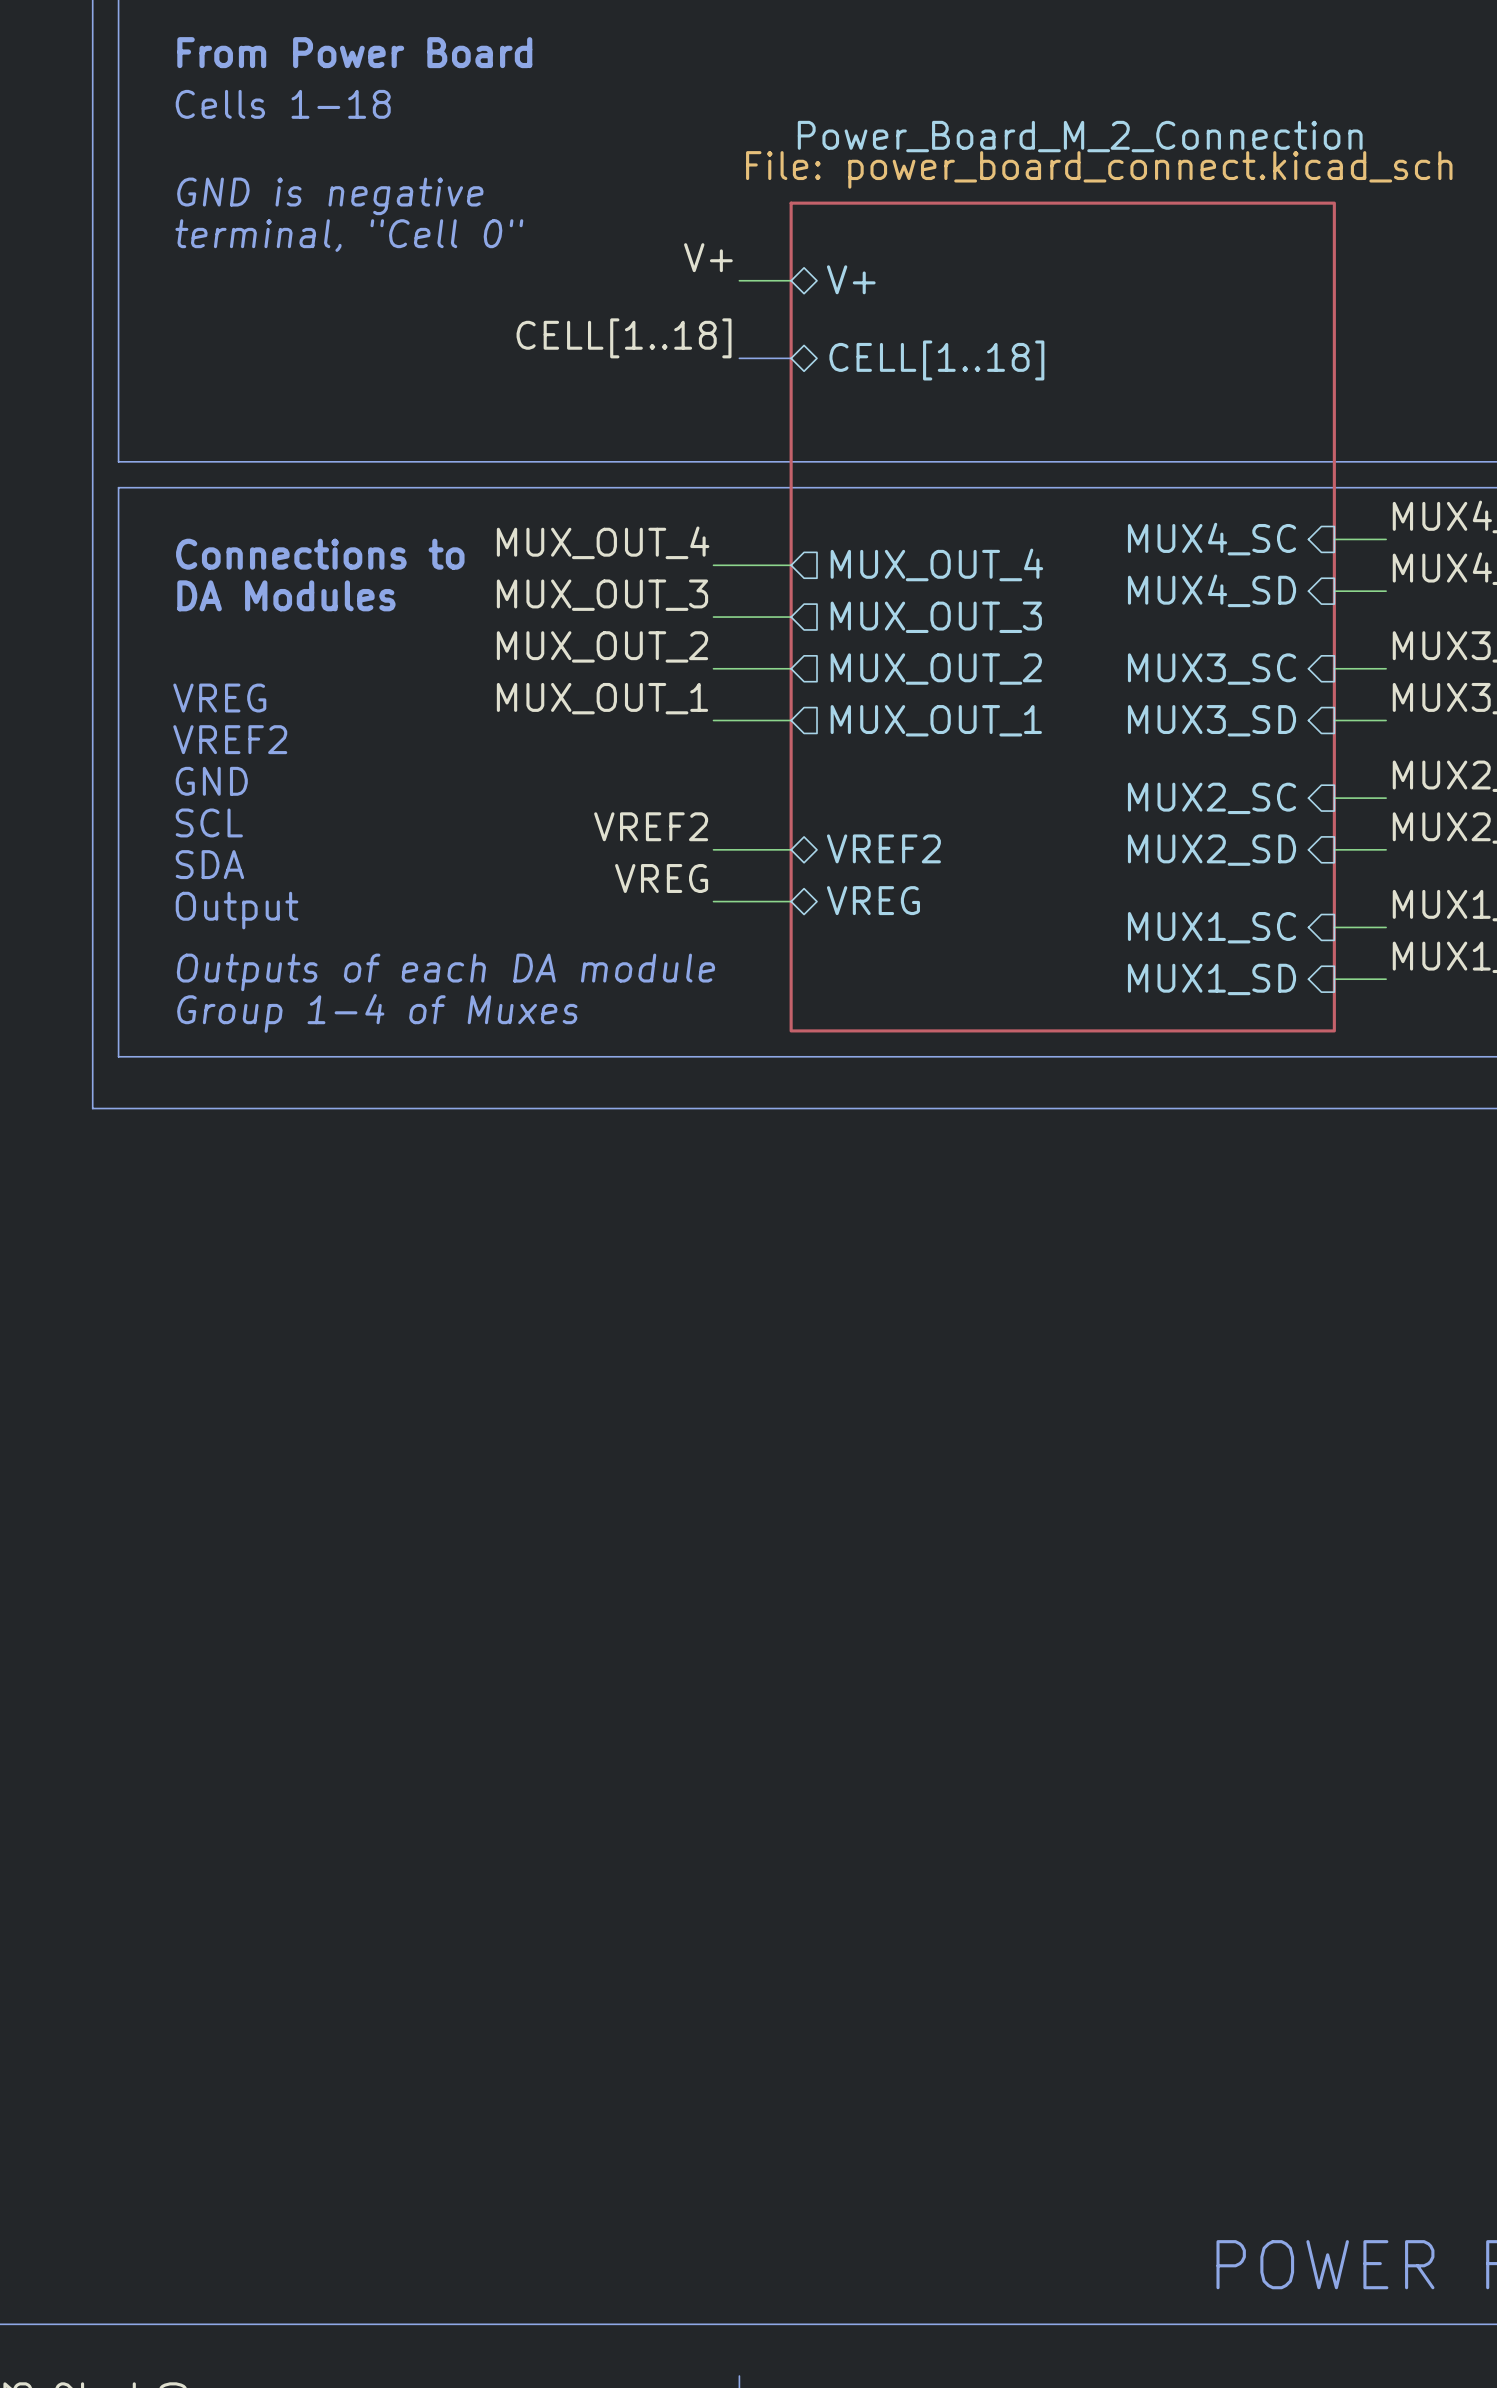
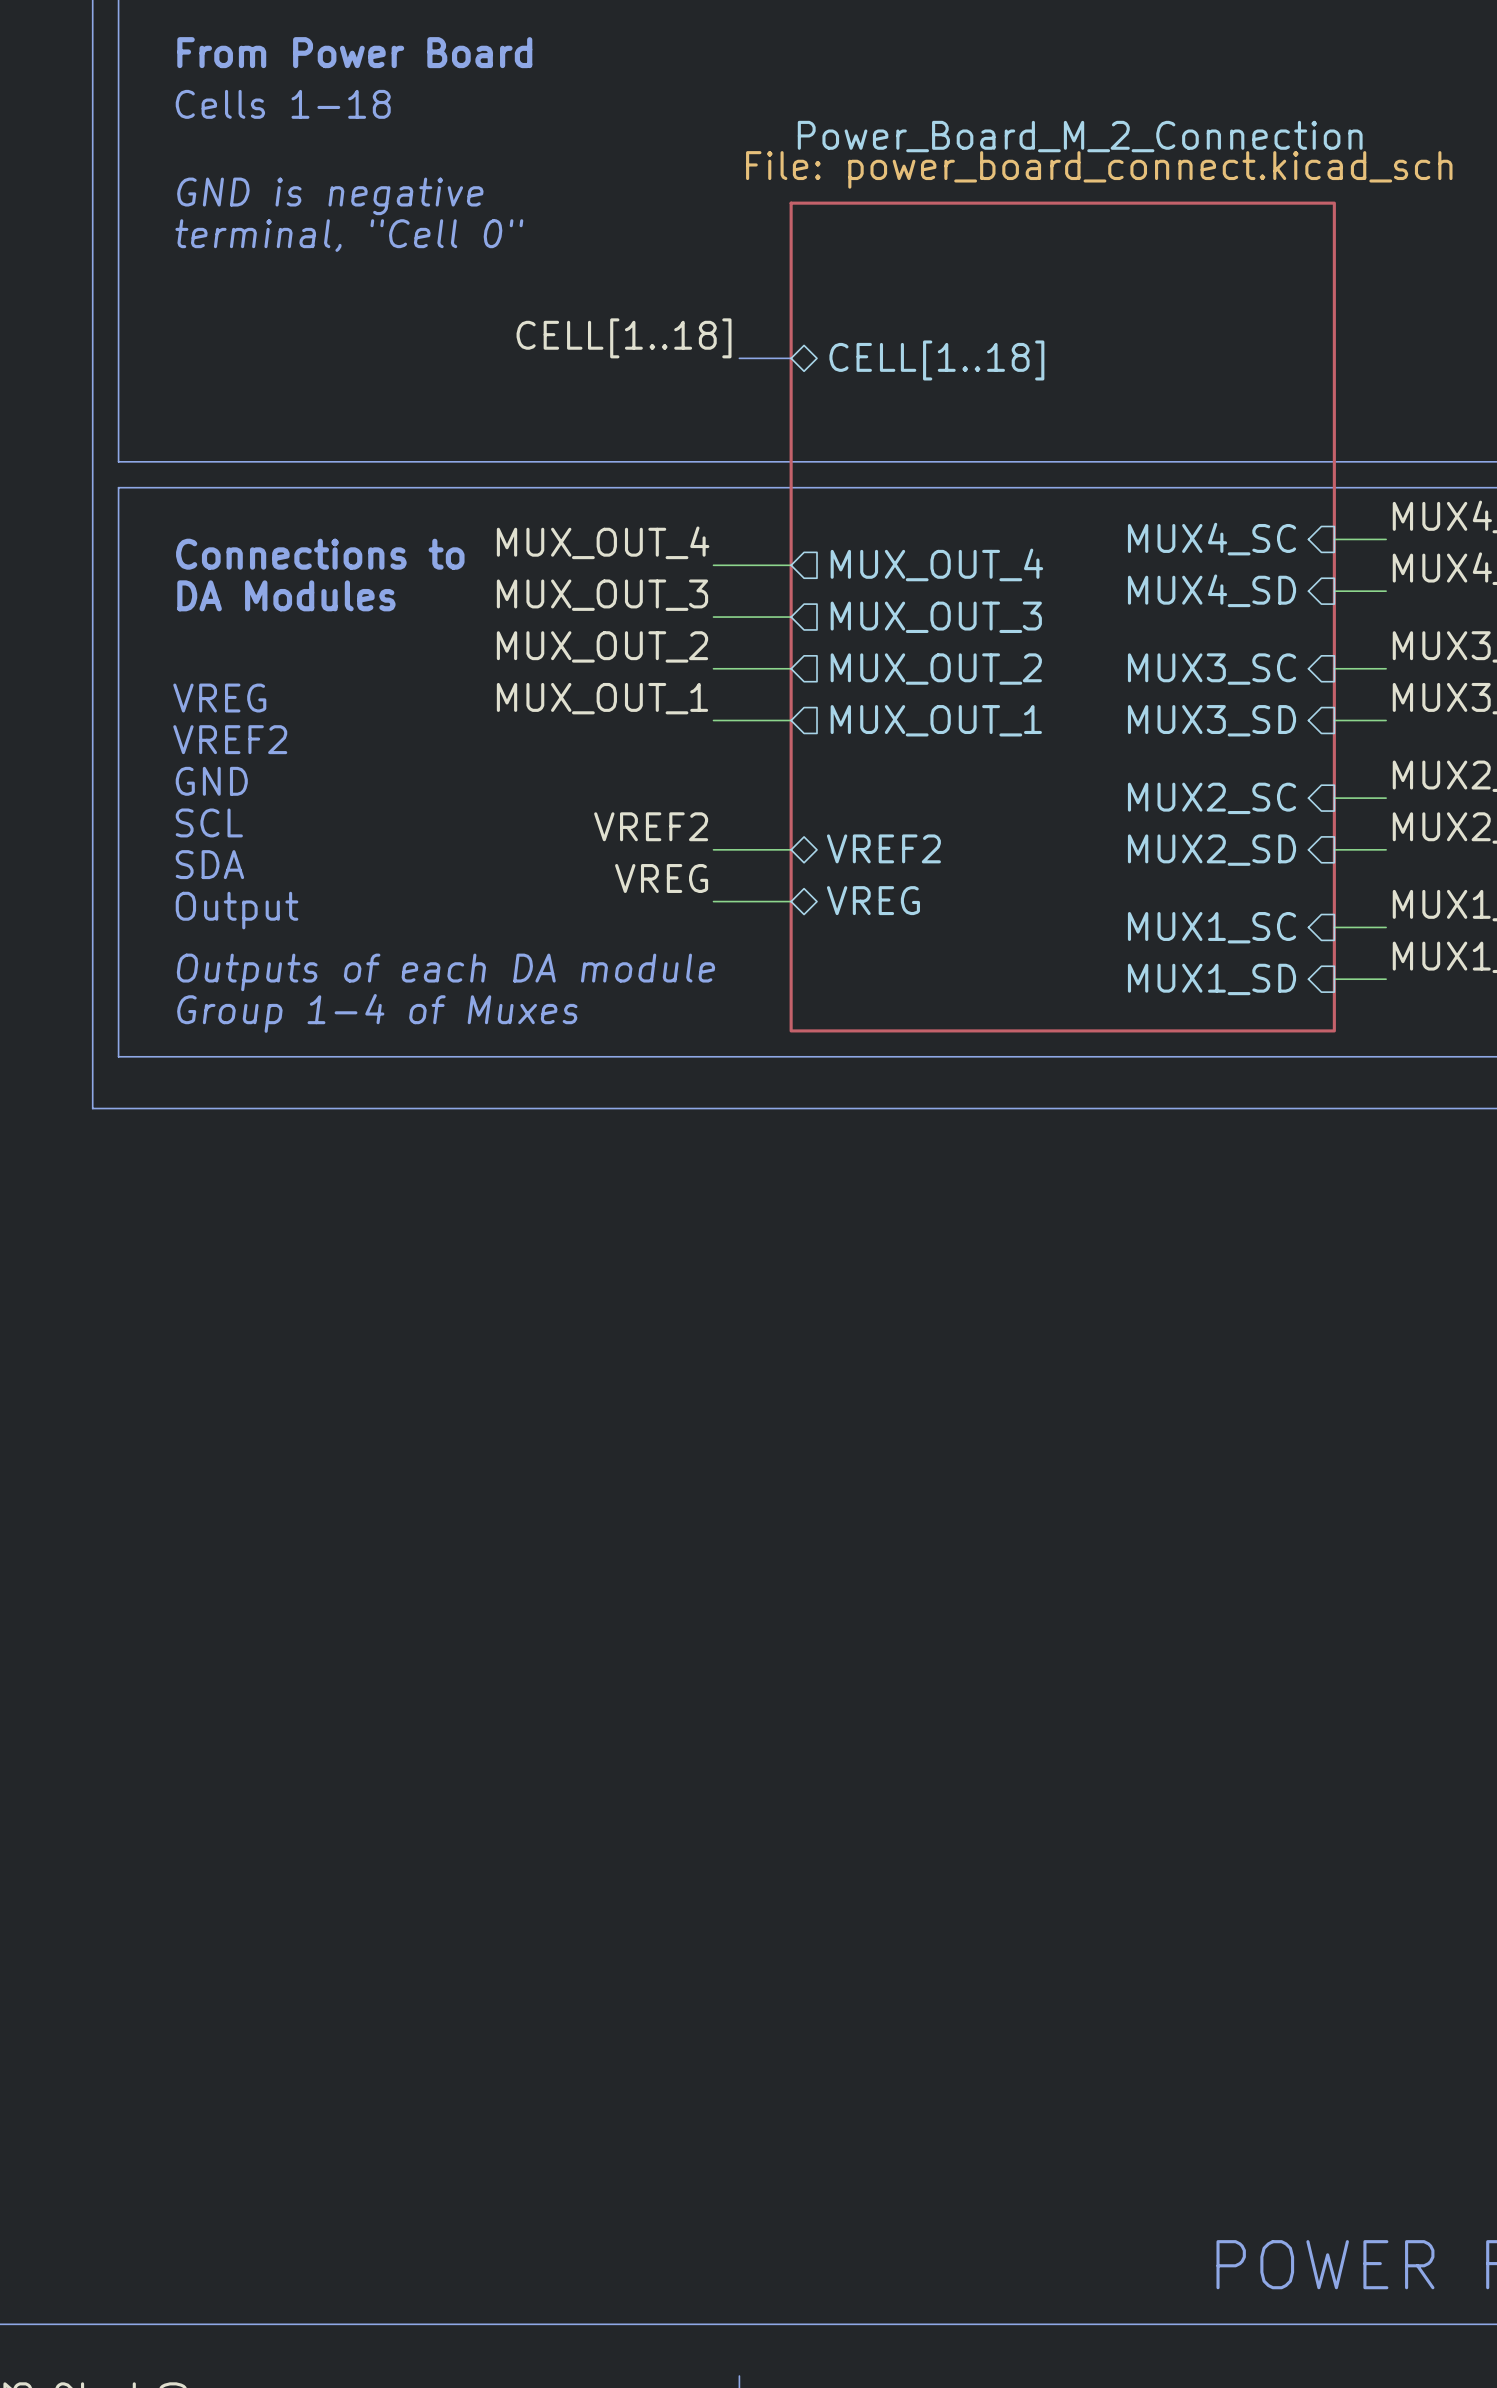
label: V+ (708, 257) -> none
sheet pin: V+ (851, 279) -> none
wire: (739, 280) (791, 280) -> none

